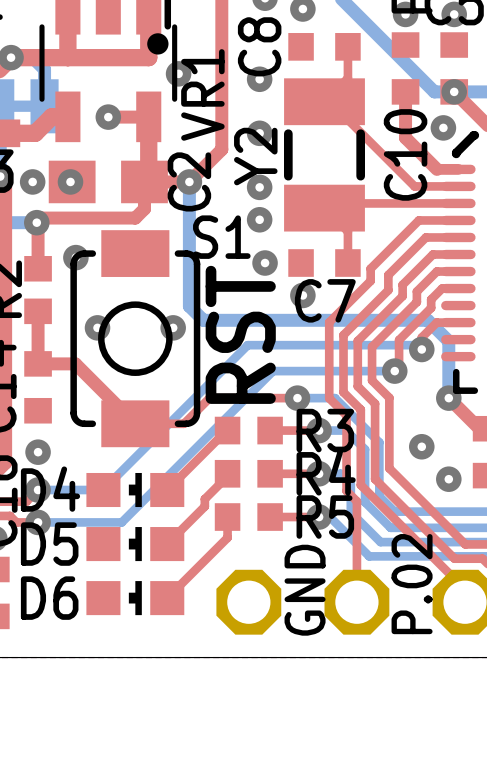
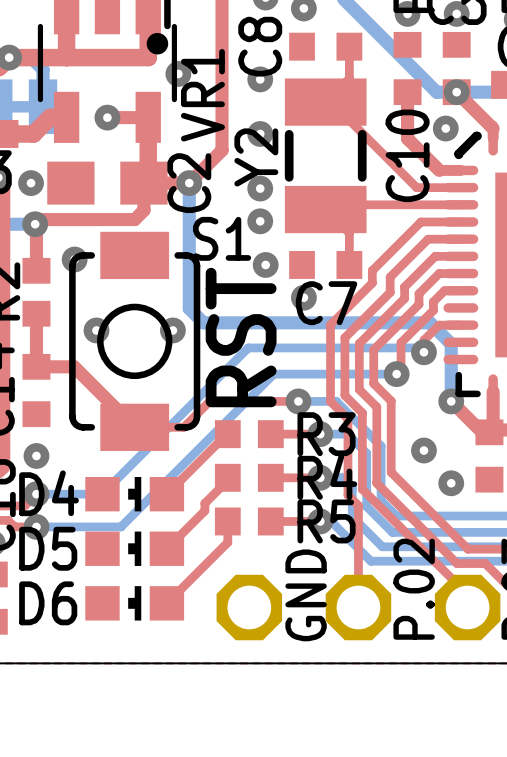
via: (70, 181) -> none

